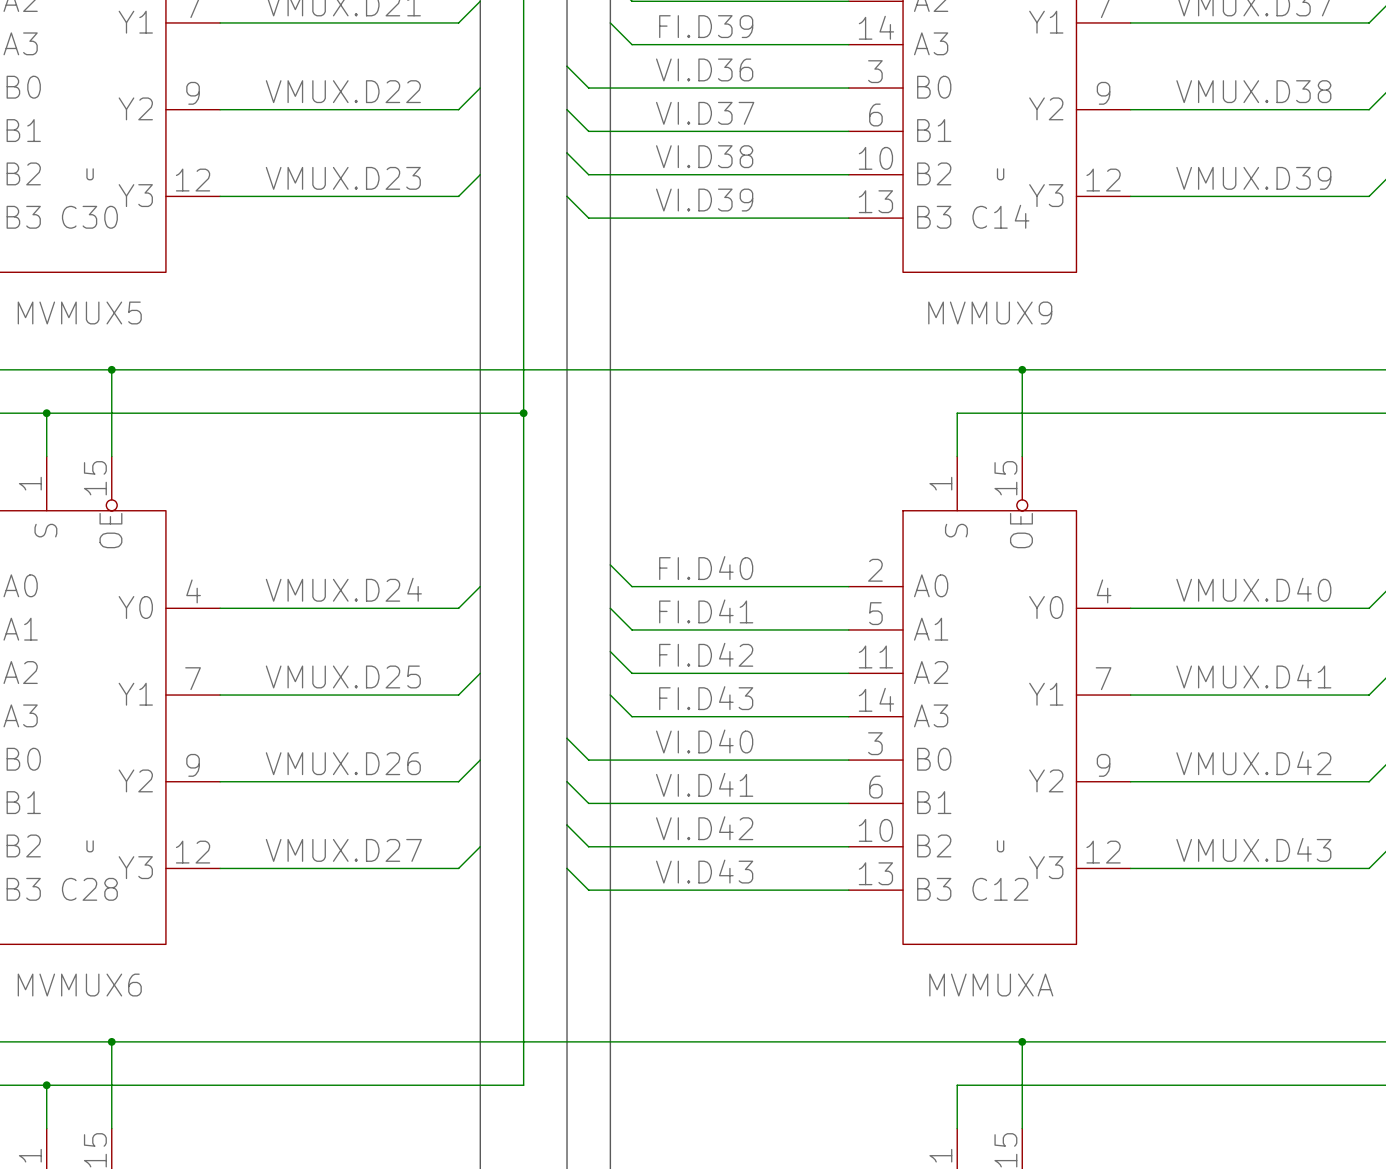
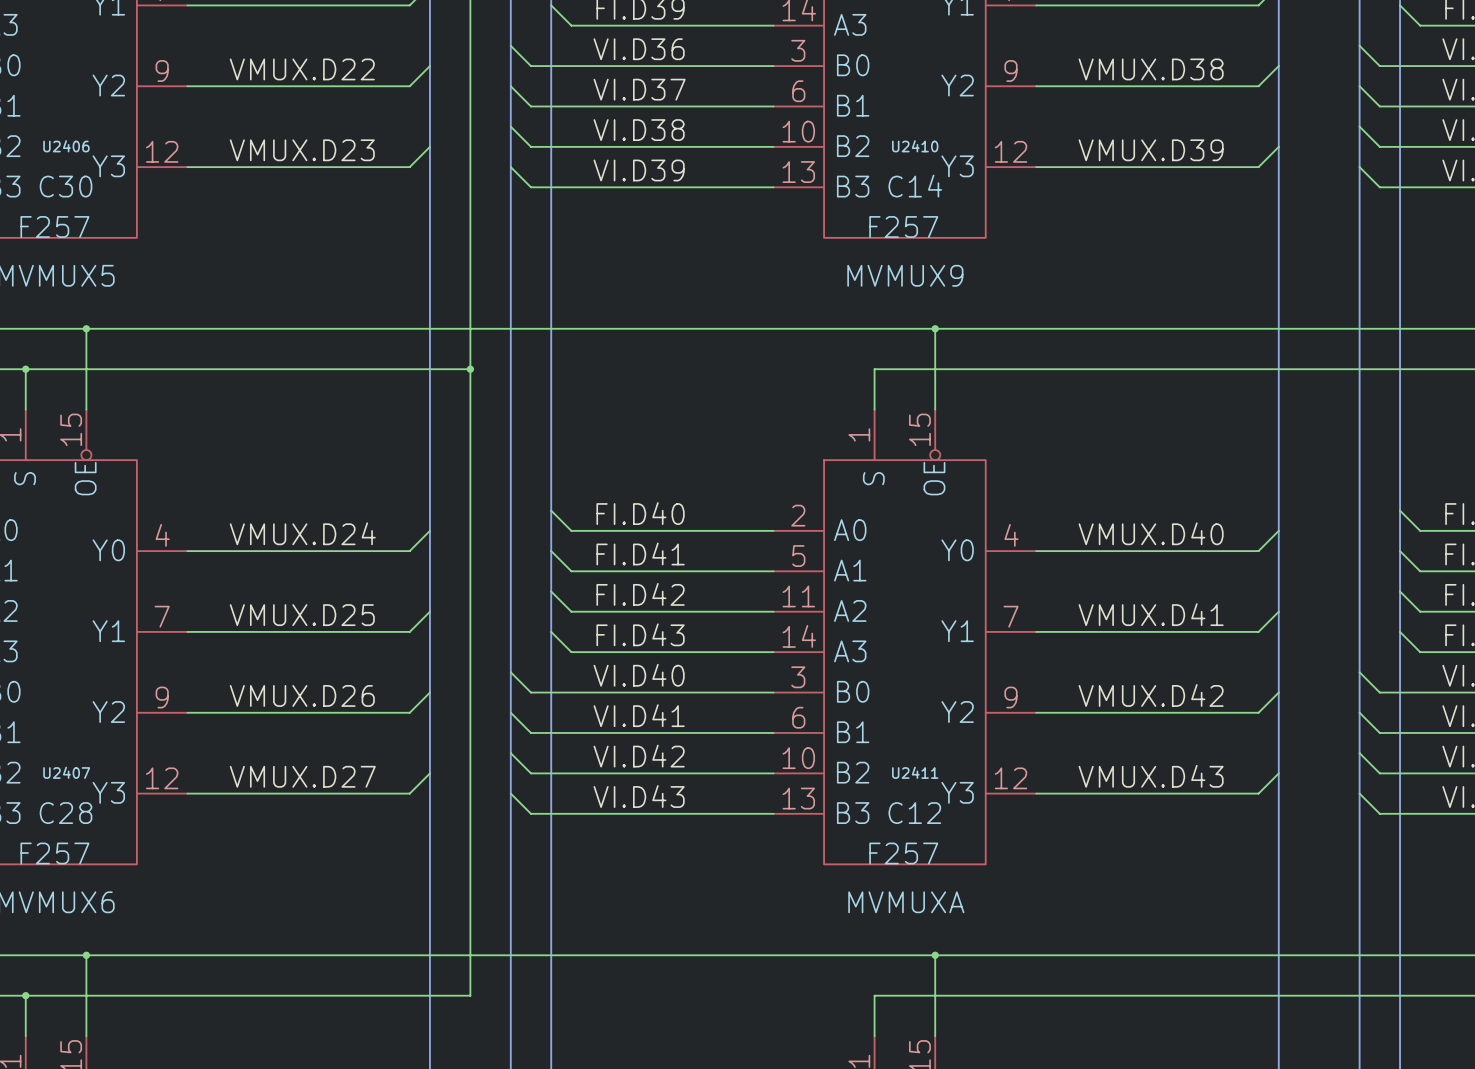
U name: U (90, 174) -> U2406 (66, 146)
U name: U (1000, 174) -> U2410 (915, 146)
U value: none -> F257 (54, 226)
U value: none -> F257 (903, 226)
U name: U (90, 846) -> U2407 (66, 772)
U name: U (1000, 846) -> U2411 (915, 772)
U value: none -> F257 (54, 853)
U value: none -> F257 (903, 853)

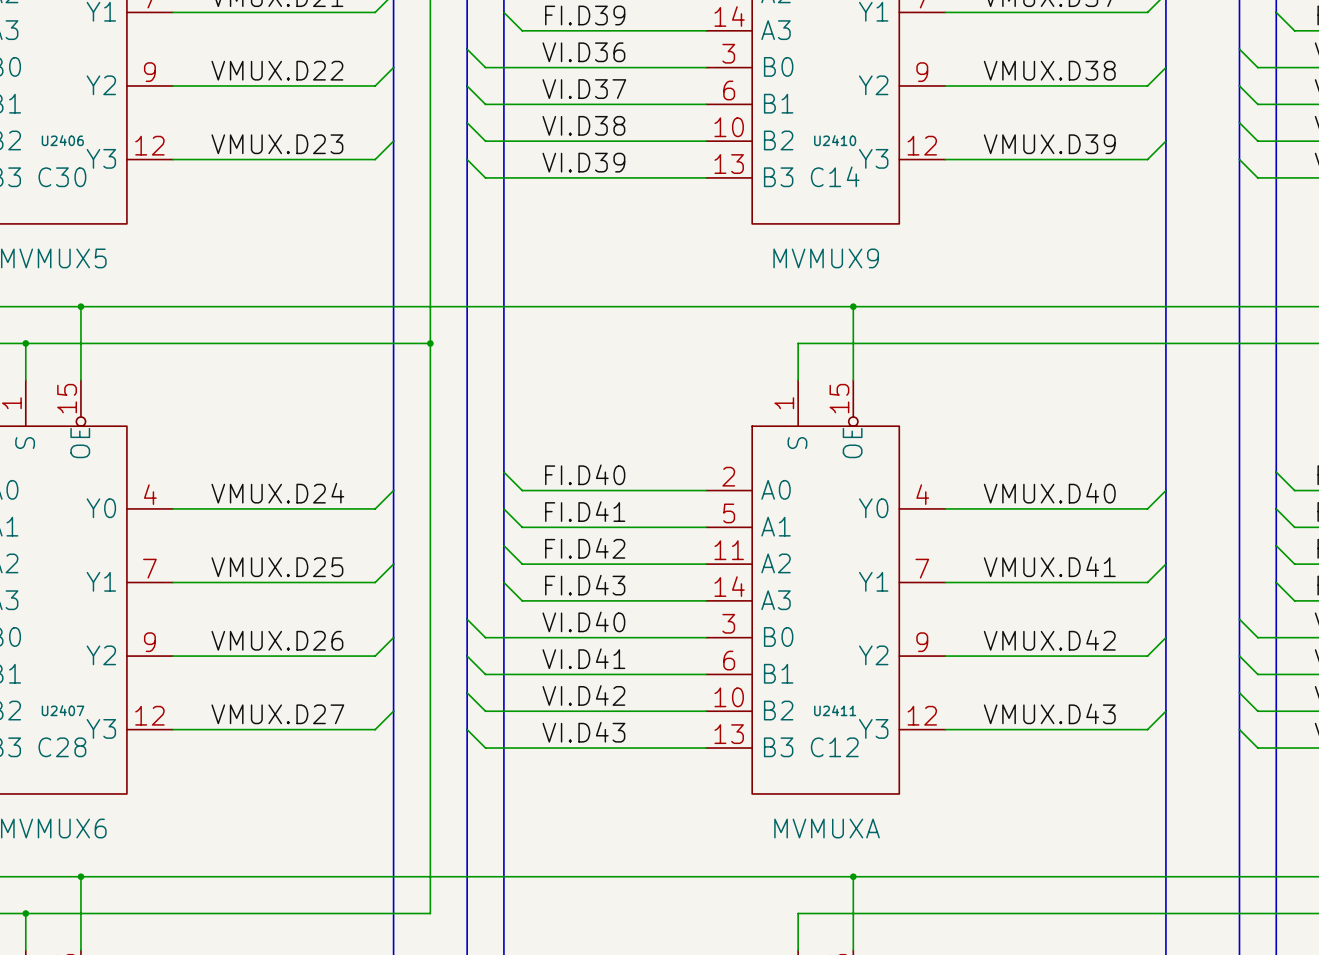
U2406 value: F257 (54, 226) -> none
U2410 value: F257 (903, 226) -> none
U2407 value: F257 (54, 853) -> none
U2411 value: F257 (903, 853) -> none

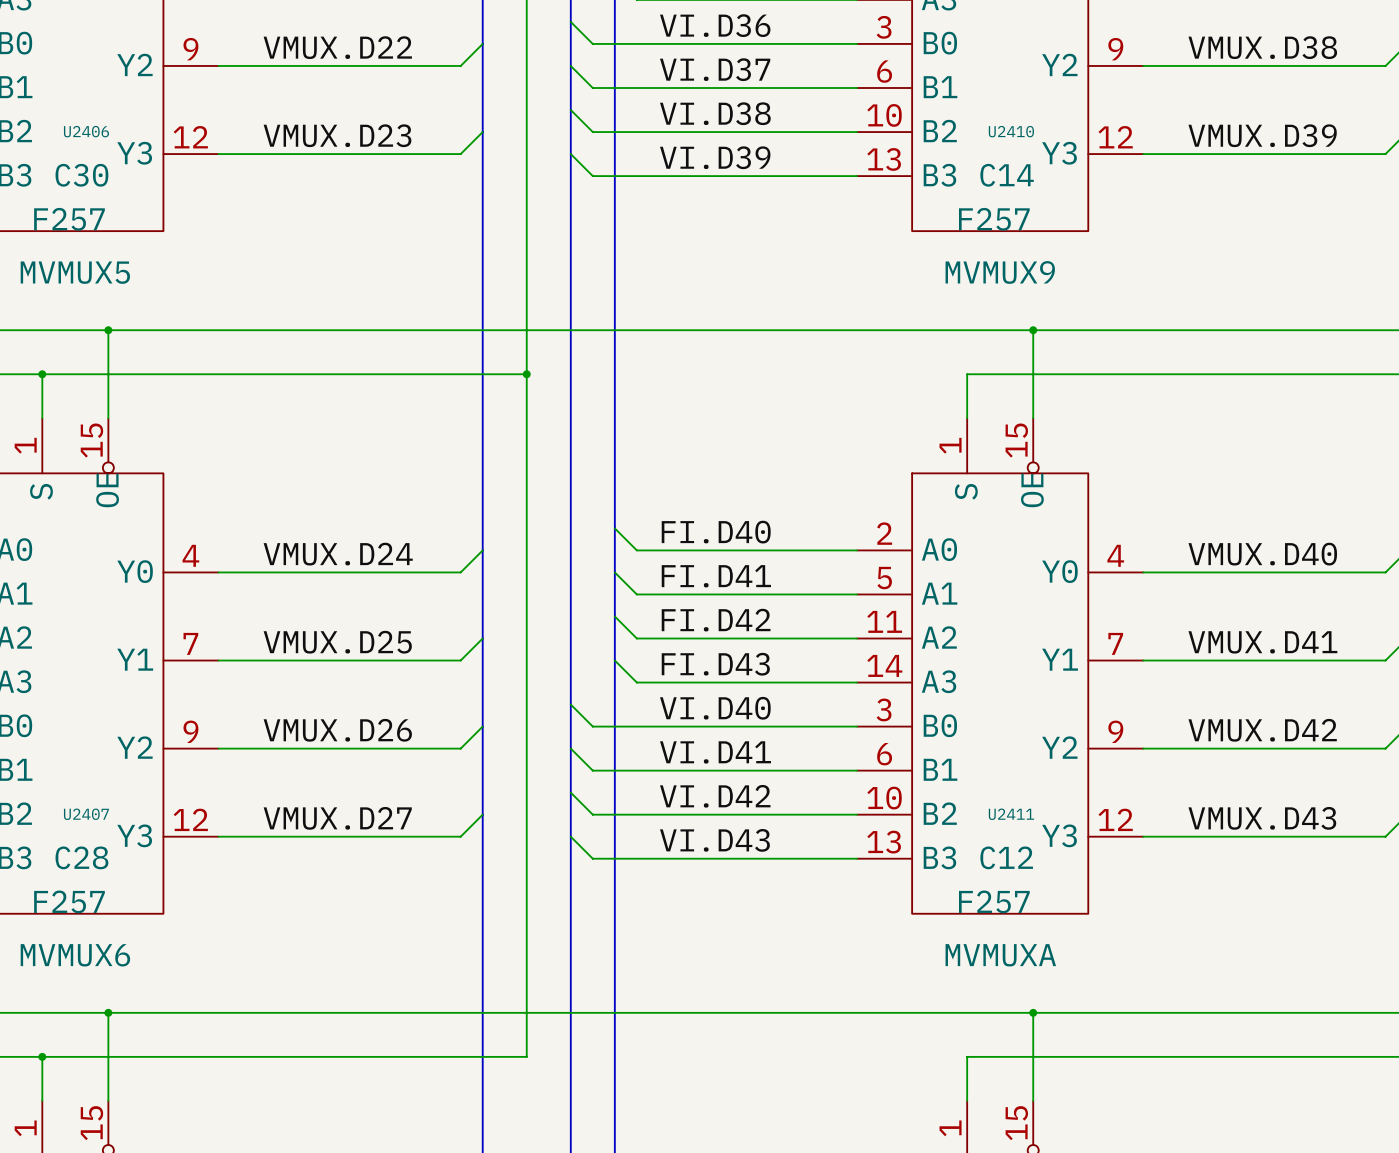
U2406 value: none -> F257 (69, 219)
U2410 value: none -> F257 (994, 219)
U2407 value: none -> F257 (69, 901)
U2411 value: none -> F257 (994, 901)

